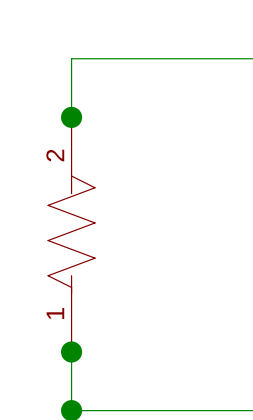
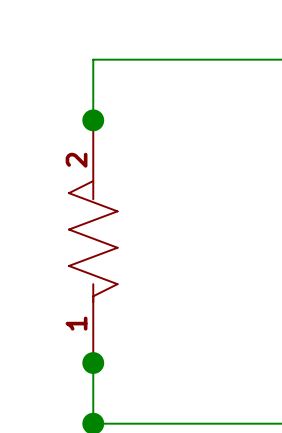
part flip: as is (71, 234) -> left-right (93, 241)

